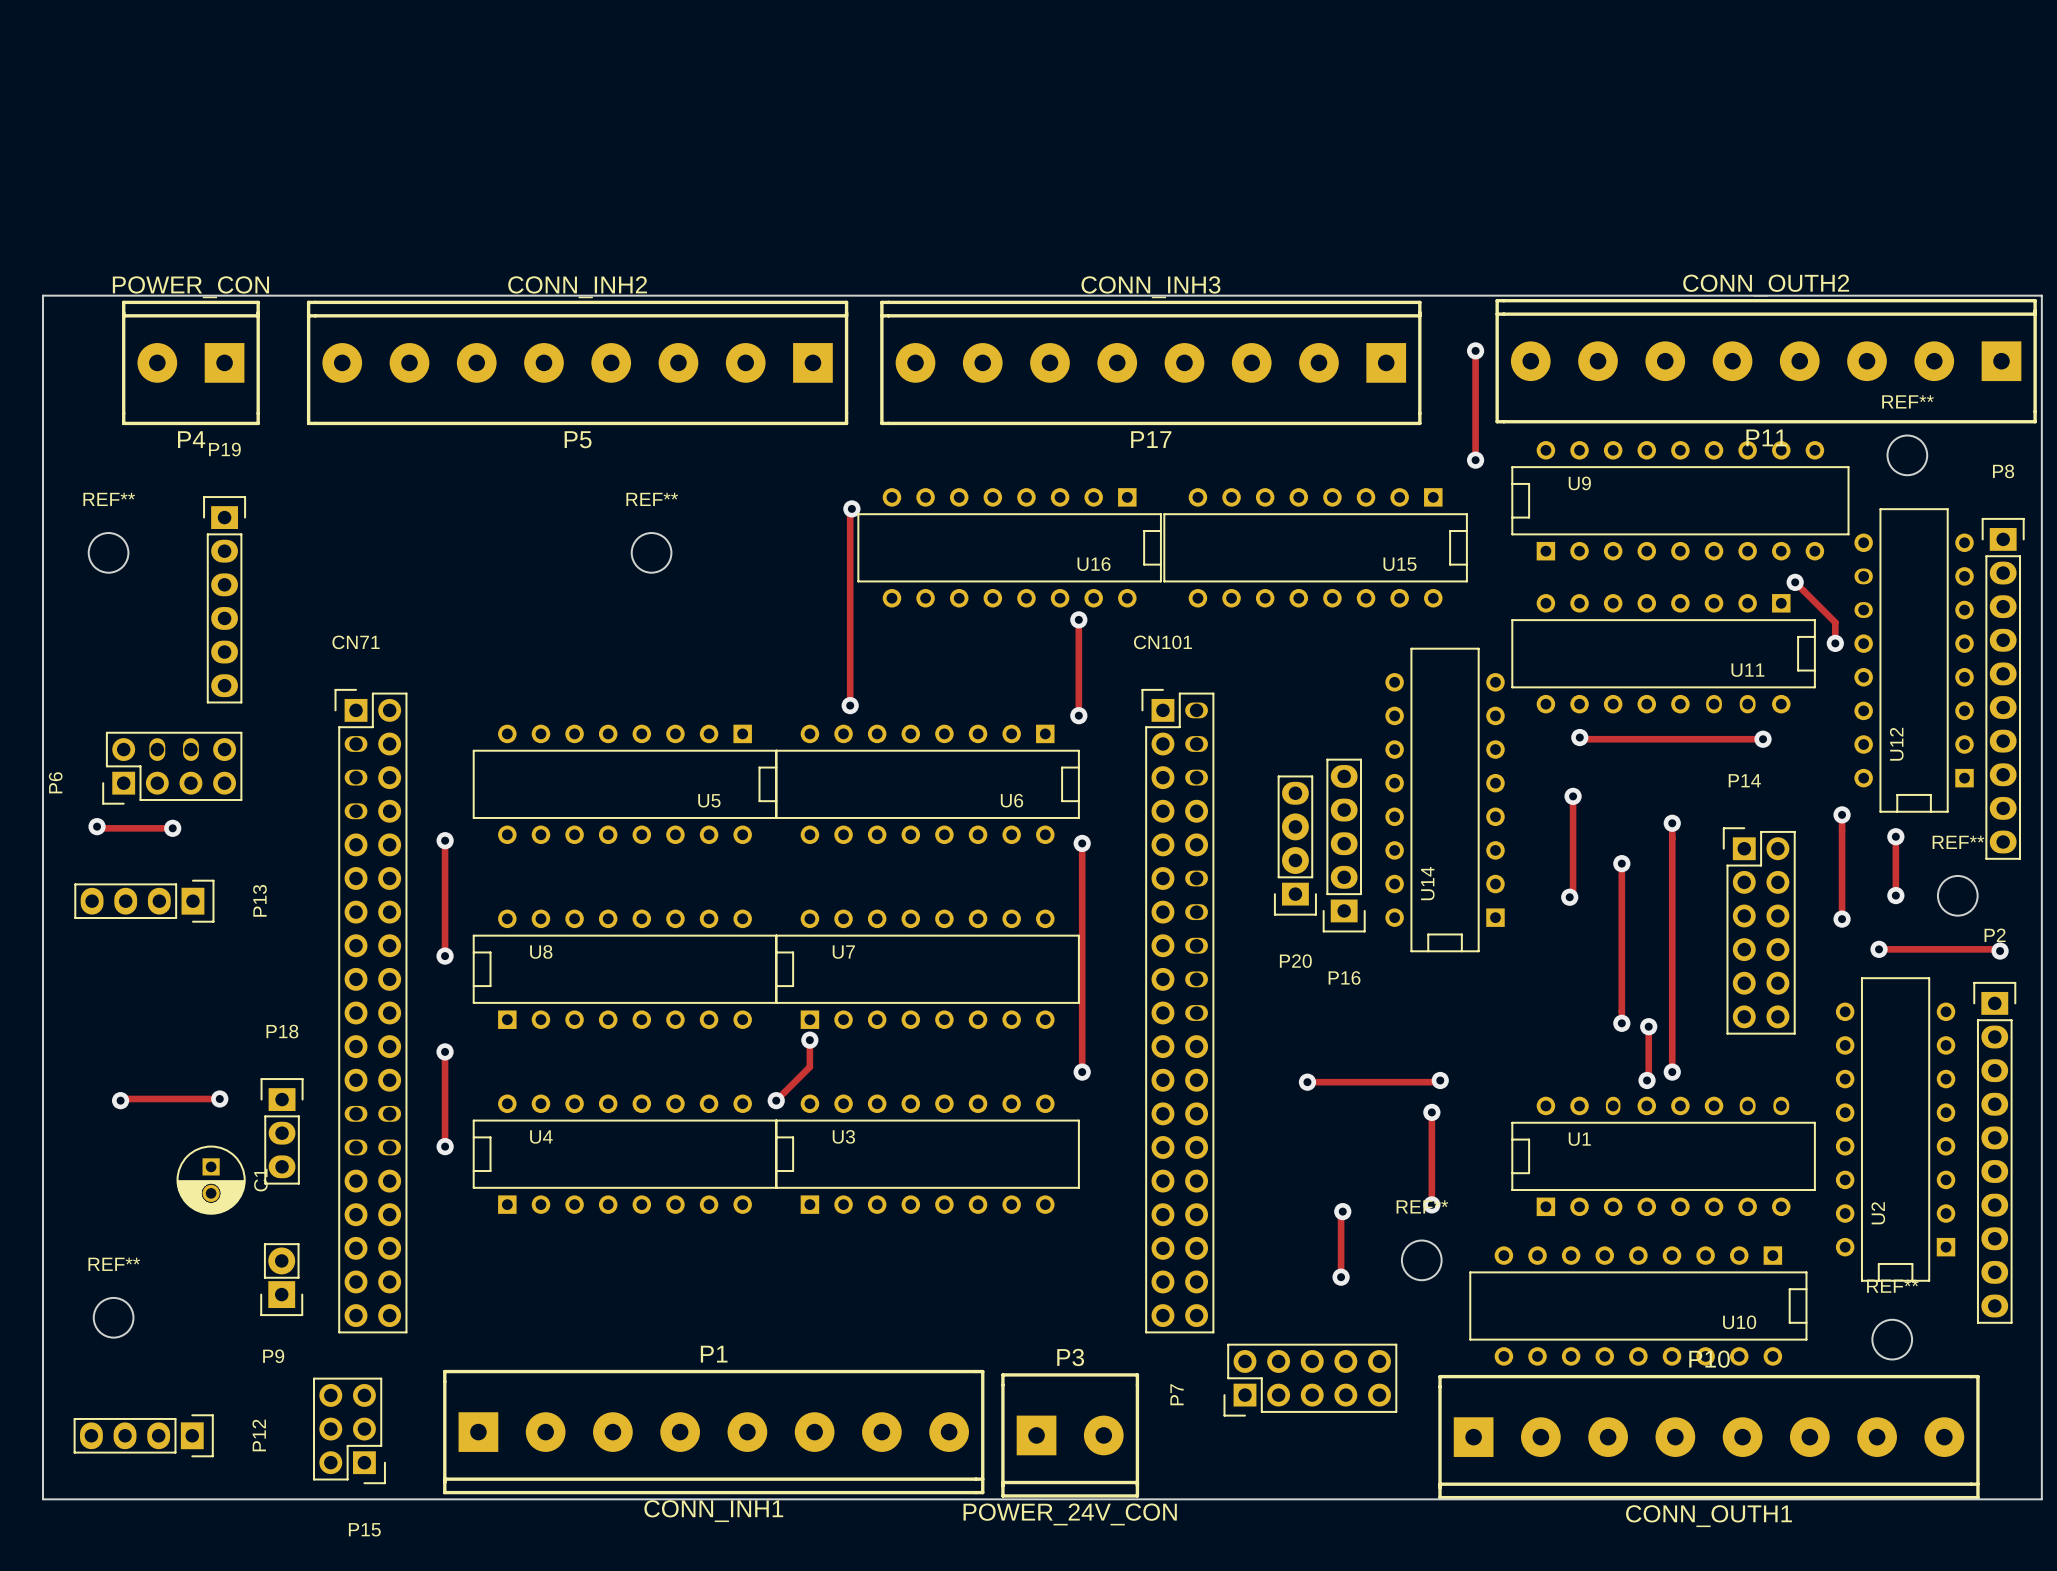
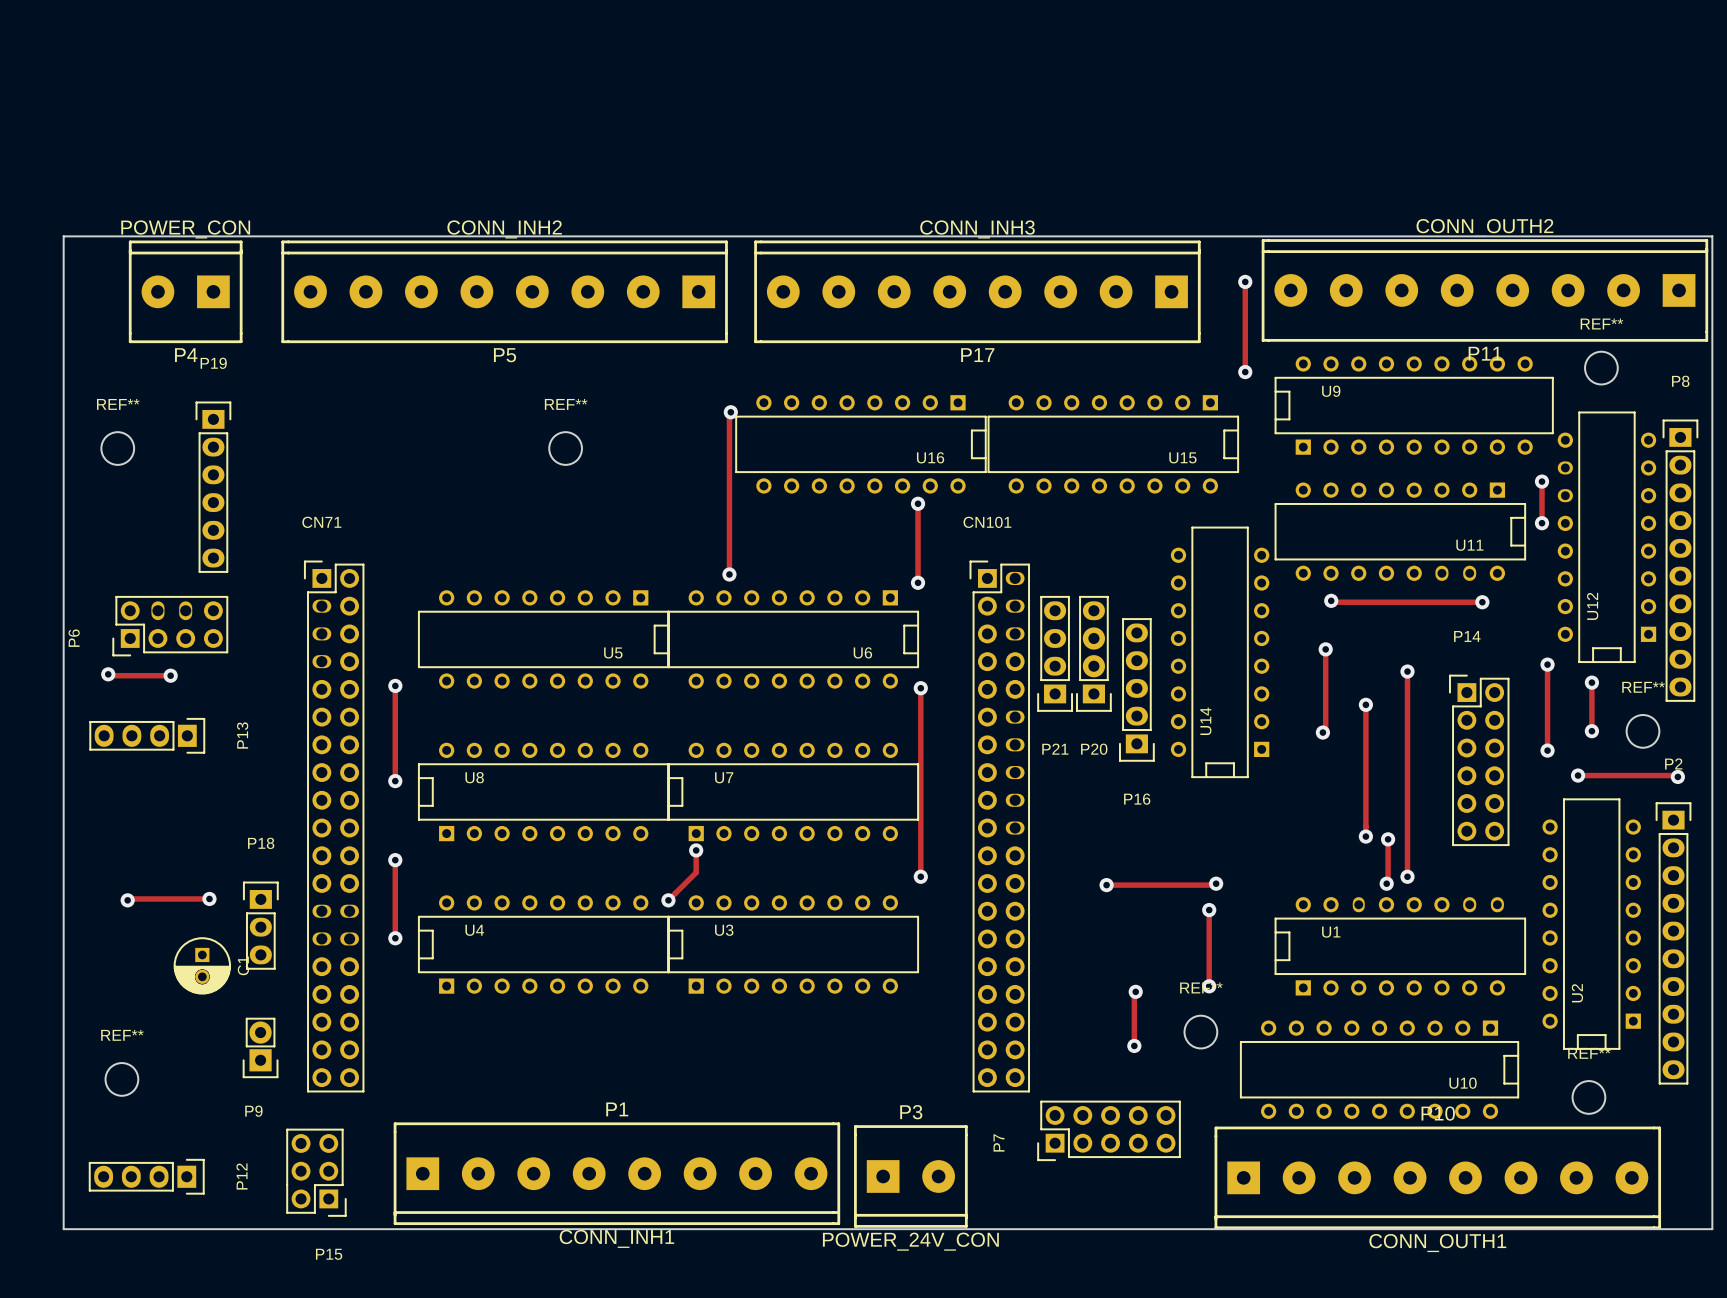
track: (1795, 582) (1835, 622) -> (1542, 481) (1542, 505)
via position: (1795, 582) -> (1542, 481)
P21: none -> (1055, 653)
P20 position: (1295, 845) -> (1093, 653)

